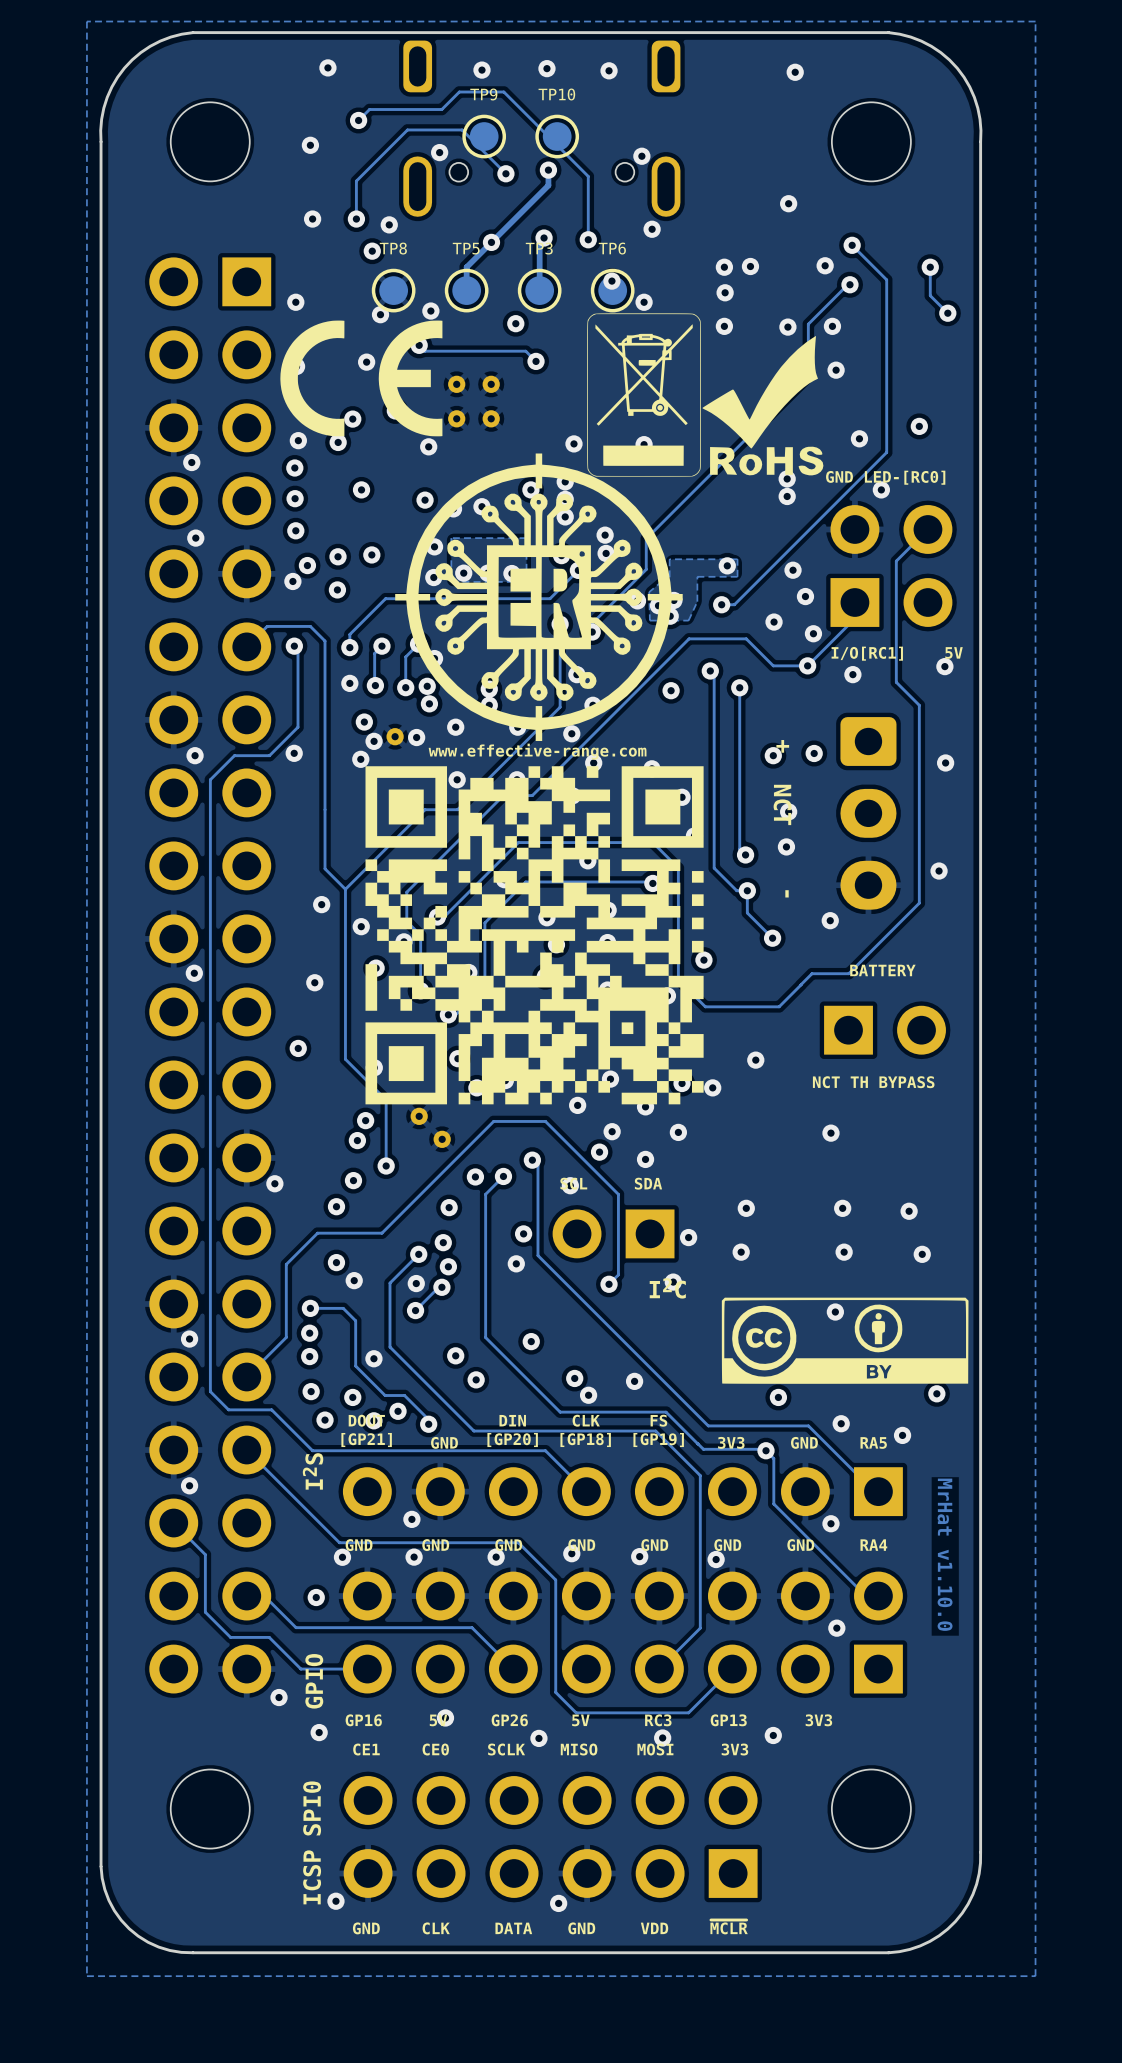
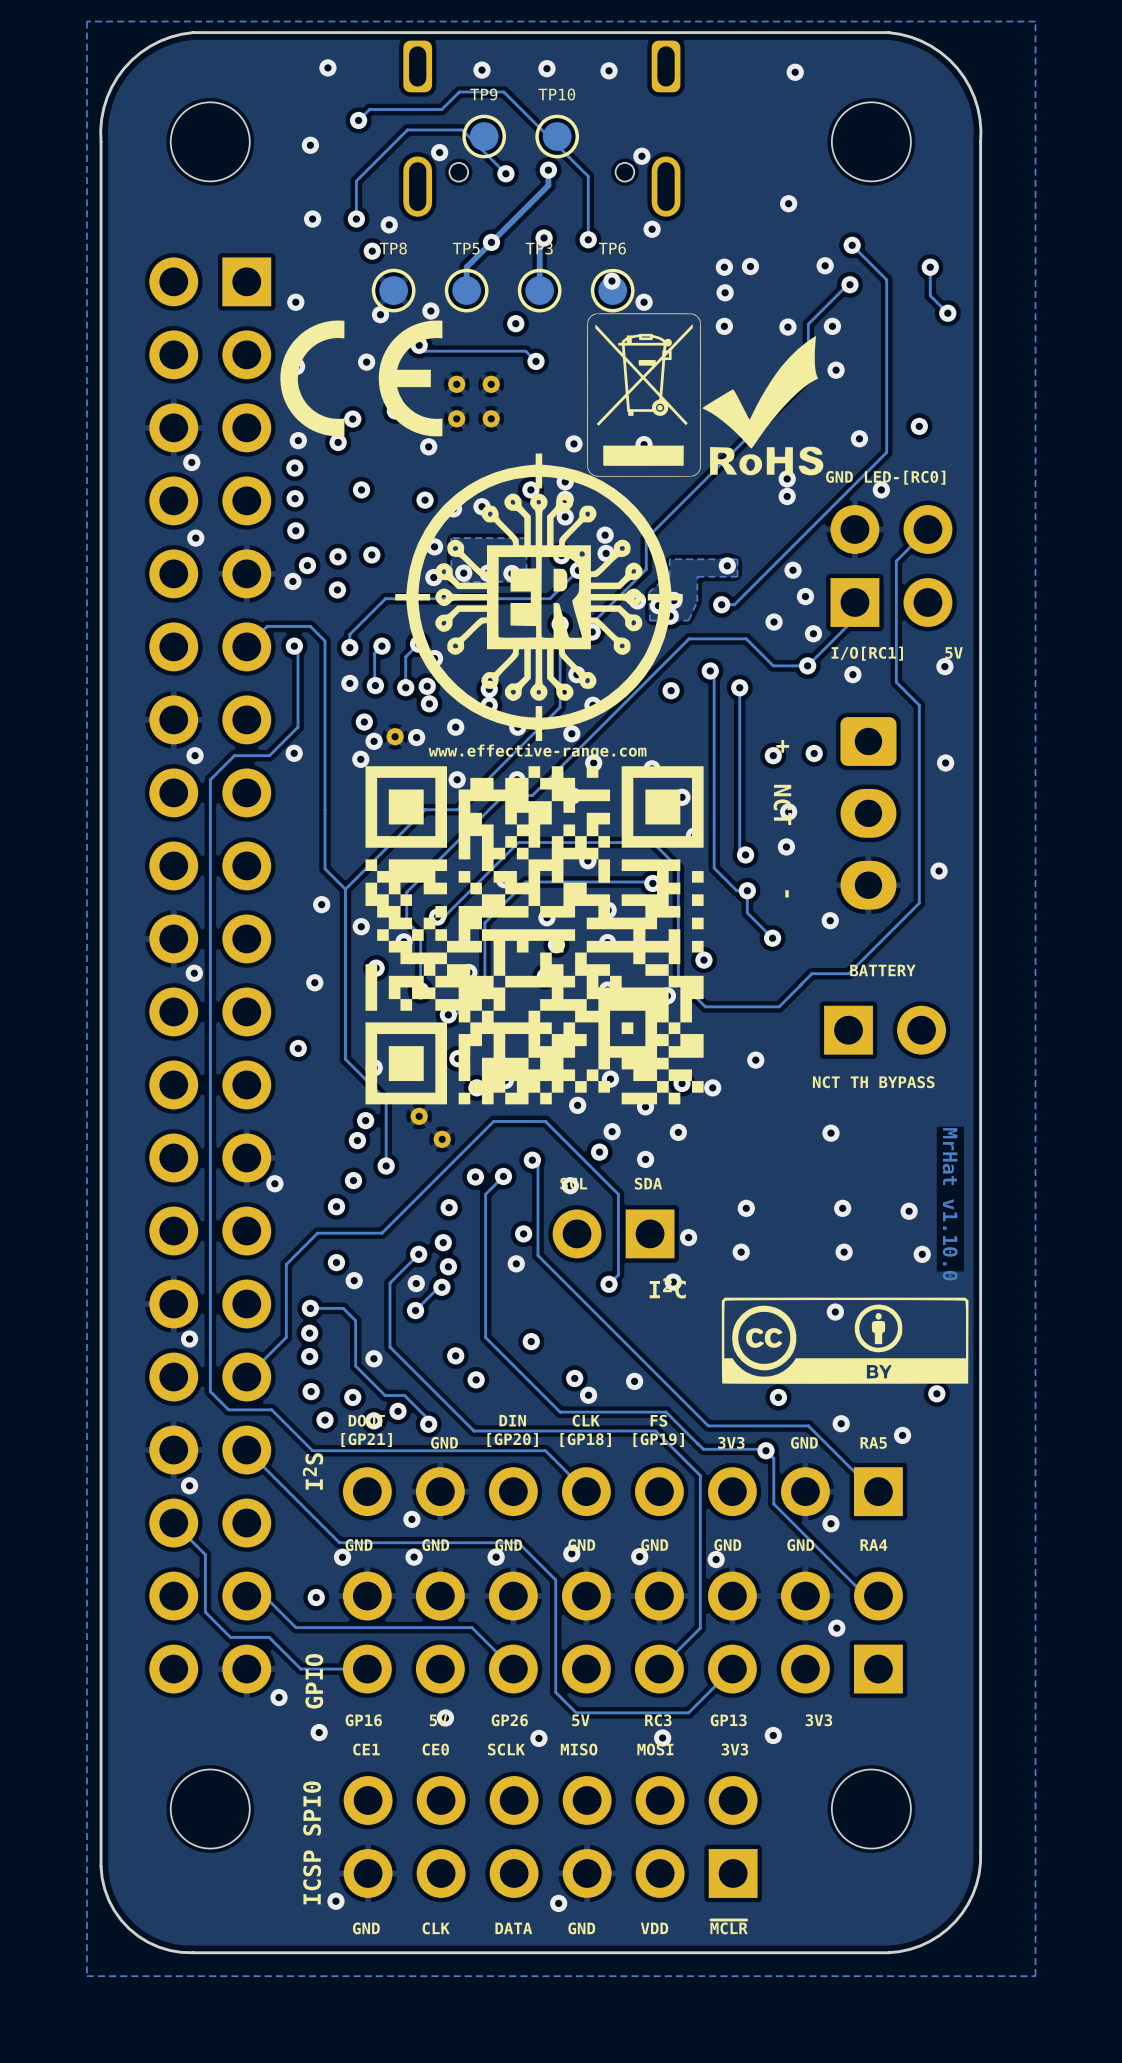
text position: MrHat v1.10.0 (945, 1554) -> MrHat v1.10.0 (950, 1204)

